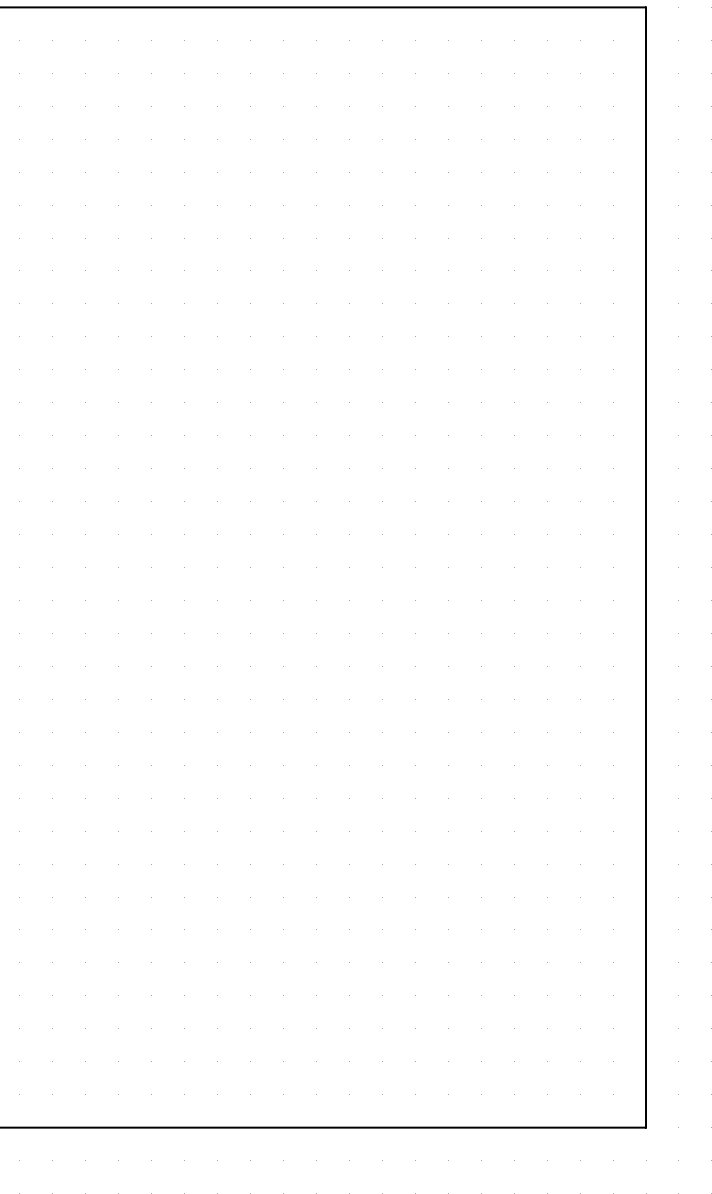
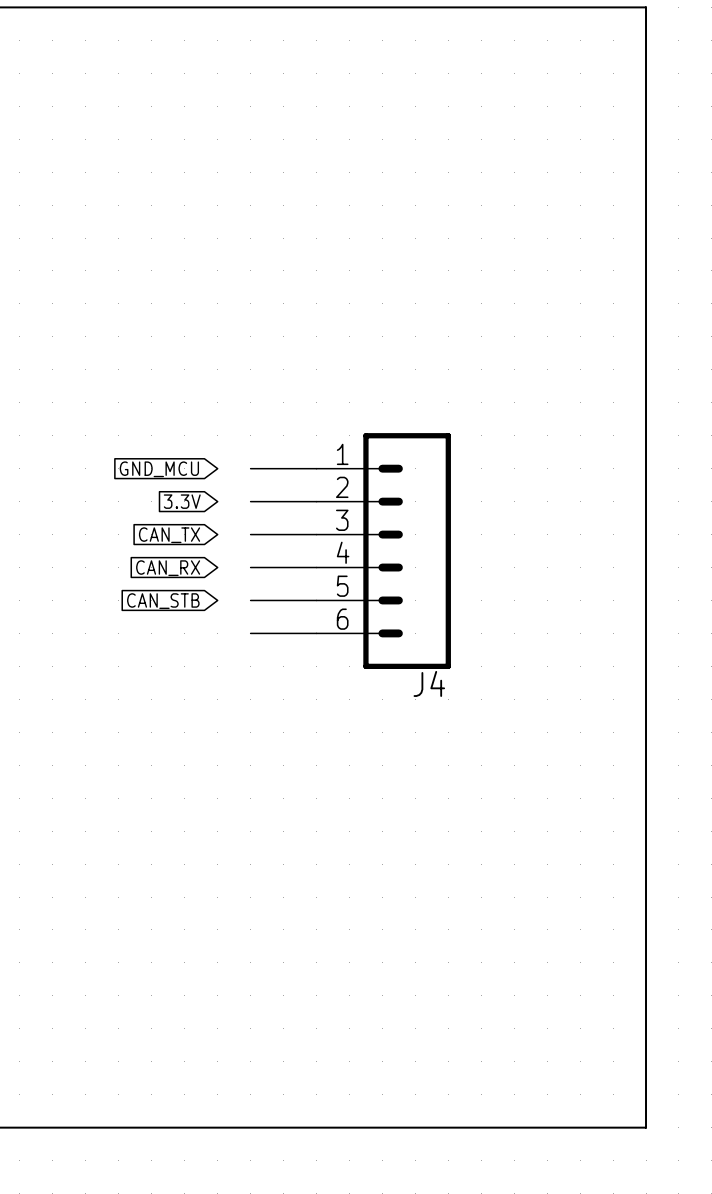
wire: none -> (250, 468) (316, 468)
global label: none -> GND_MCU (159, 469)
global label: none -> 3.3V (182, 501)
wire: none -> (250, 501) (316, 501)
wire: none -> (250, 534) (316, 534)
global label: none -> CAN_TX (169, 535)
J4: none -> (383, 551)
wire: none -> (250, 567) (316, 567)
global label: none -> CAN_RX (168, 568)
wire: none -> (250, 600) (316, 600)
global label: none -> CAN_STB (163, 601)
wire: none -> (250, 633) (316, 633)

